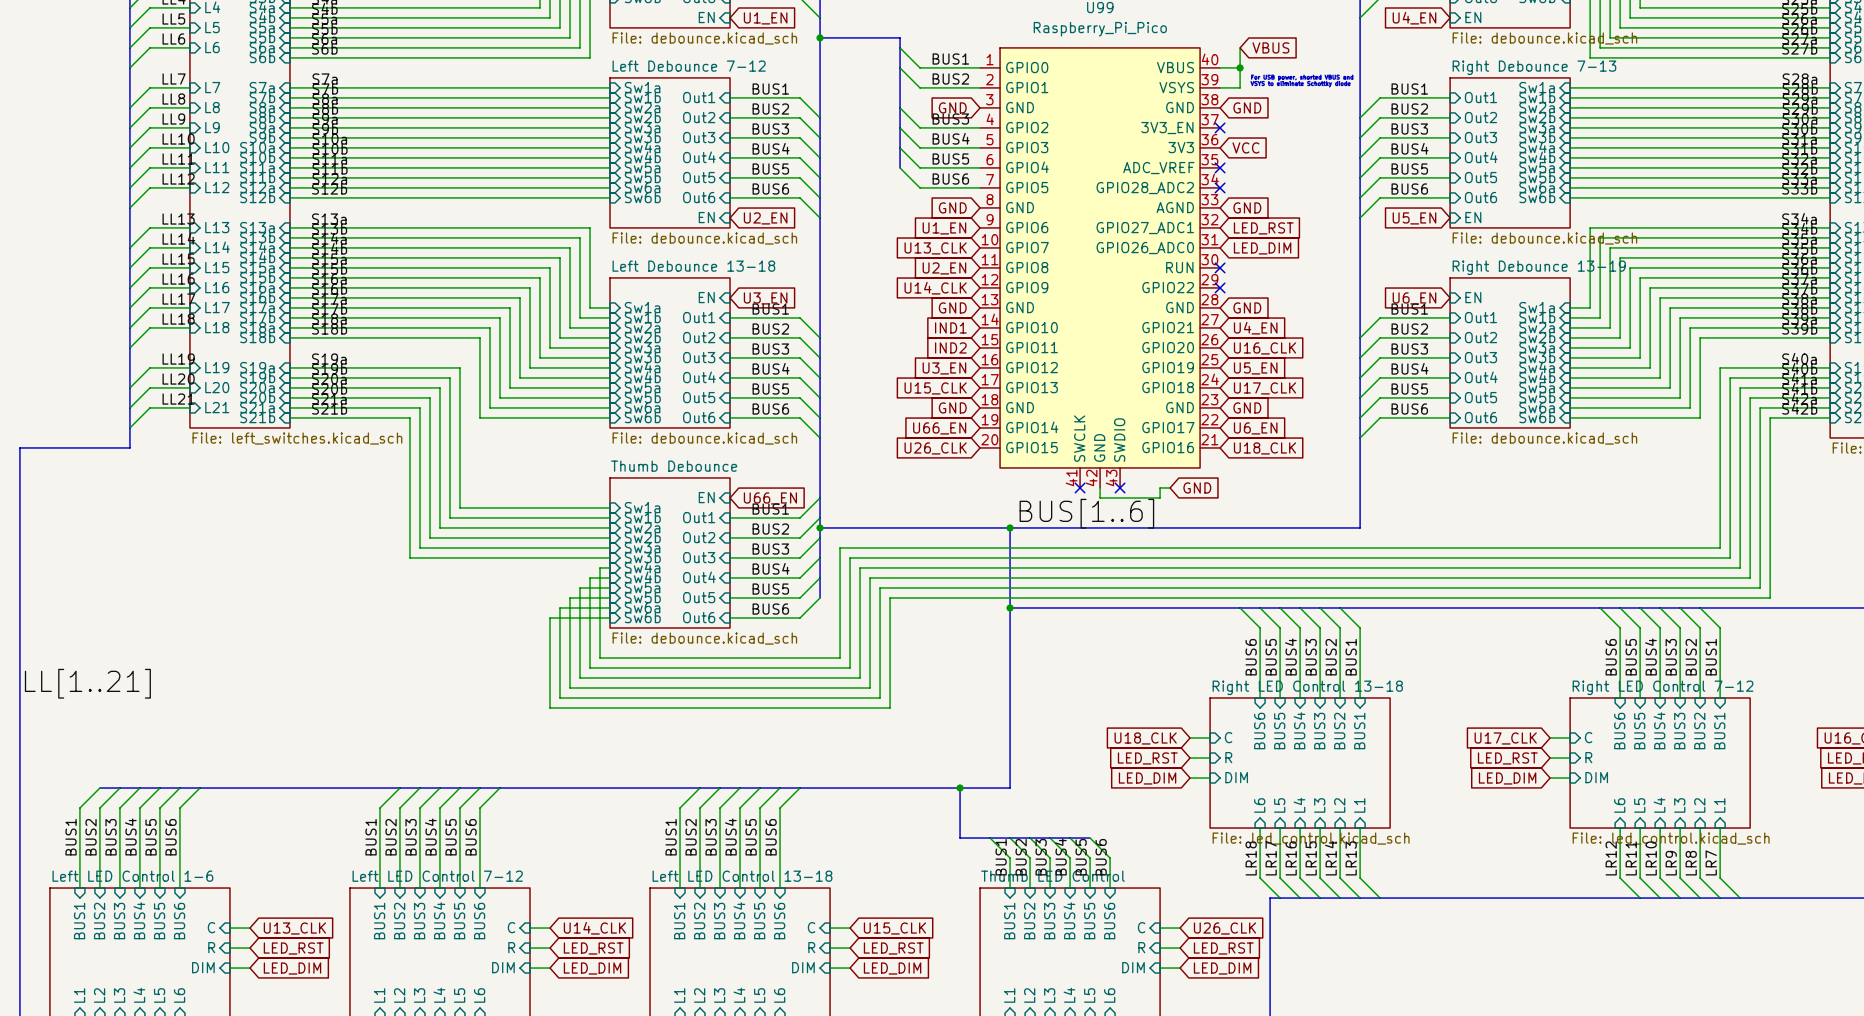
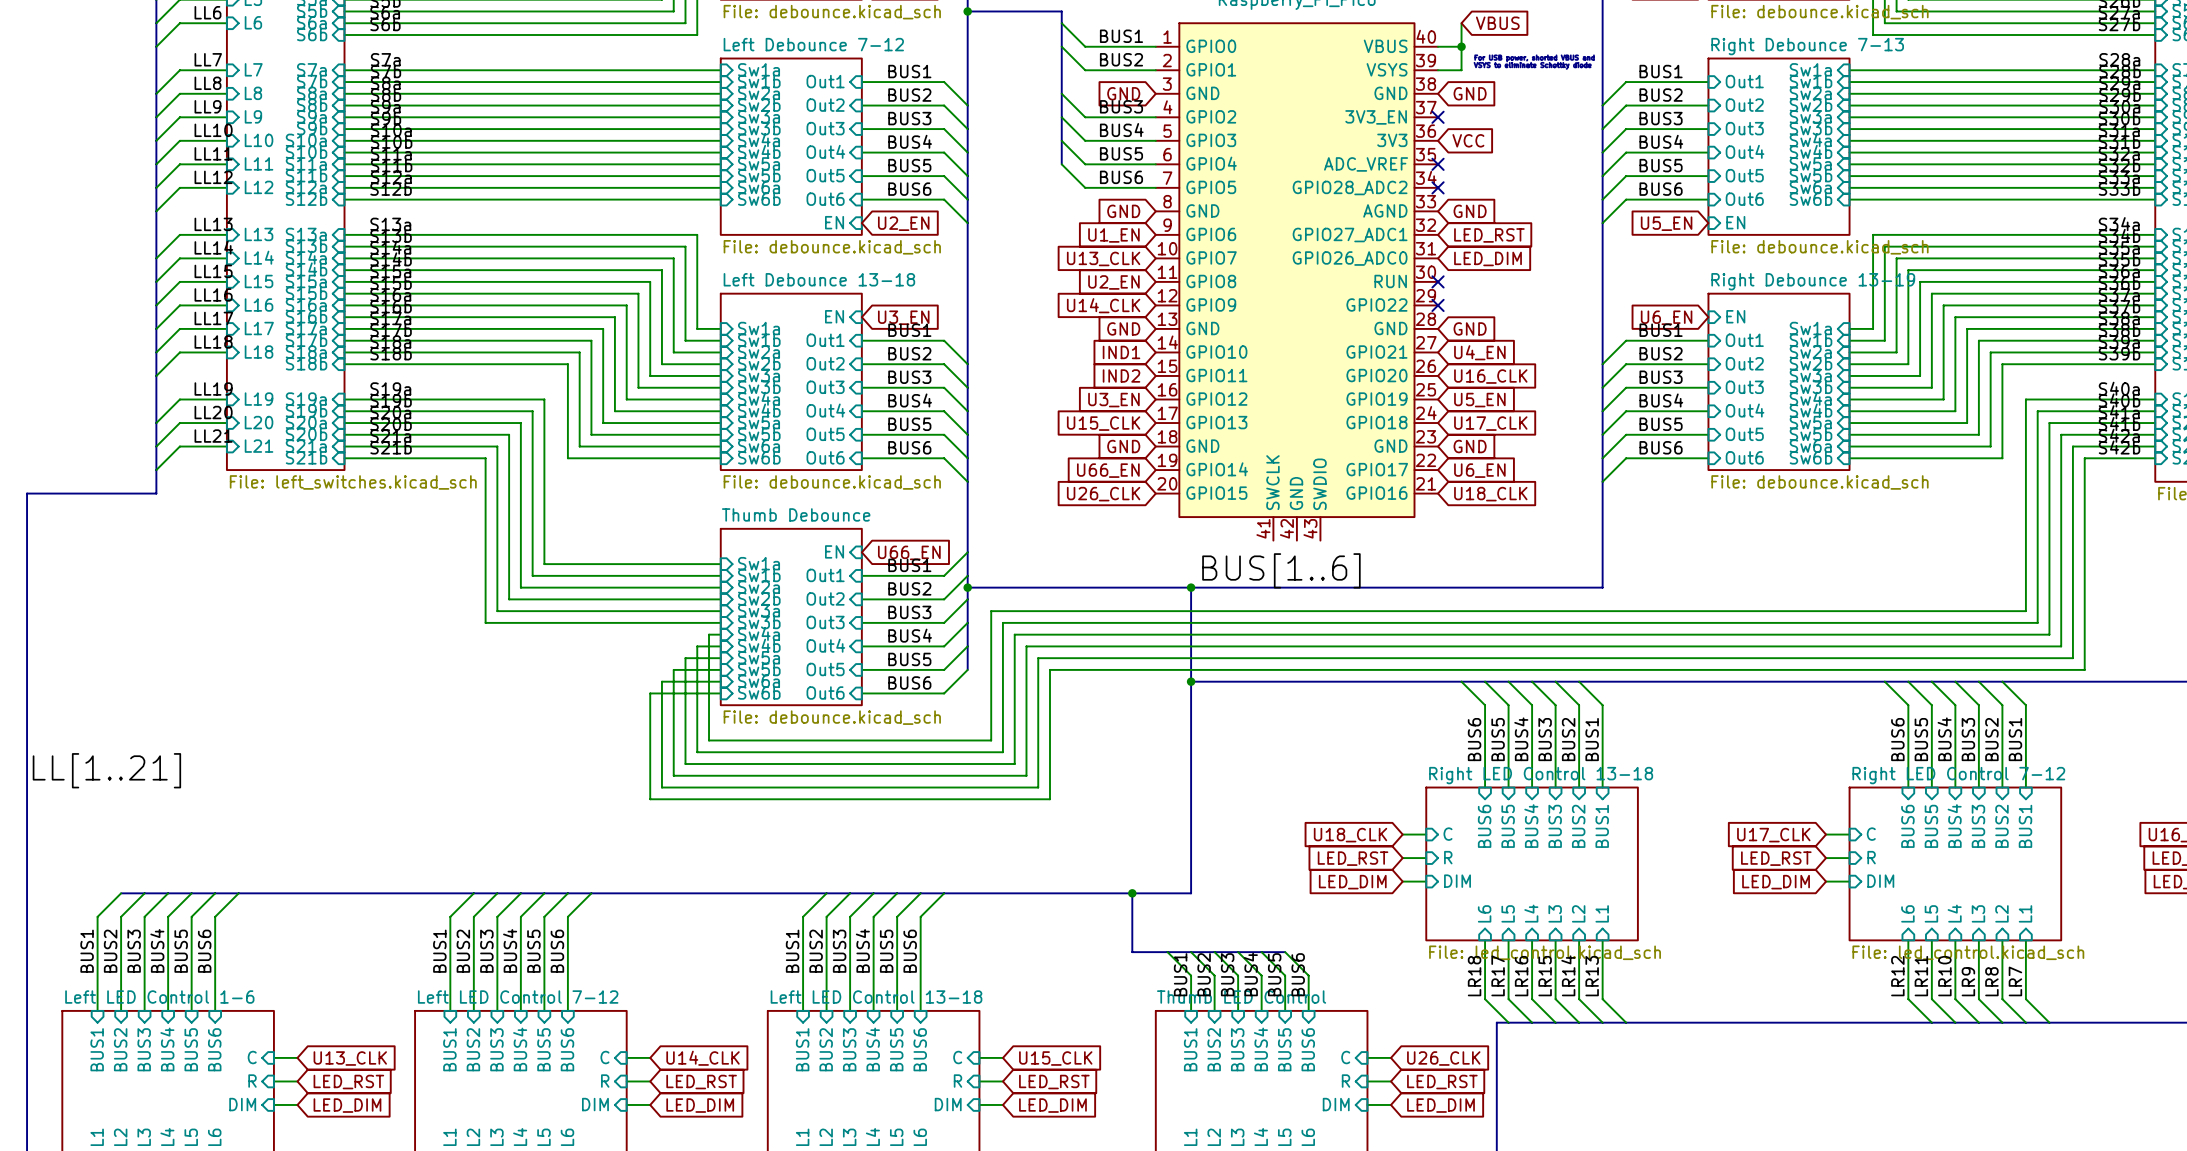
no-connect mark: (1080, 487) -> none
wire: (1100, 487) (1100, 497) (1160, 497) (1160, 487) (1170, 487) -> none
no-connect mark: (1120, 487) -> none
global label: GND (1197, 487) -> none

